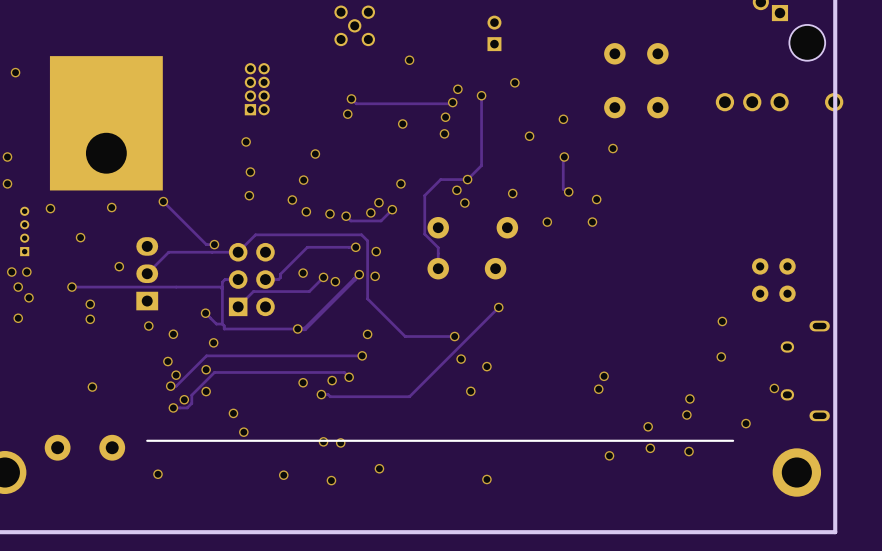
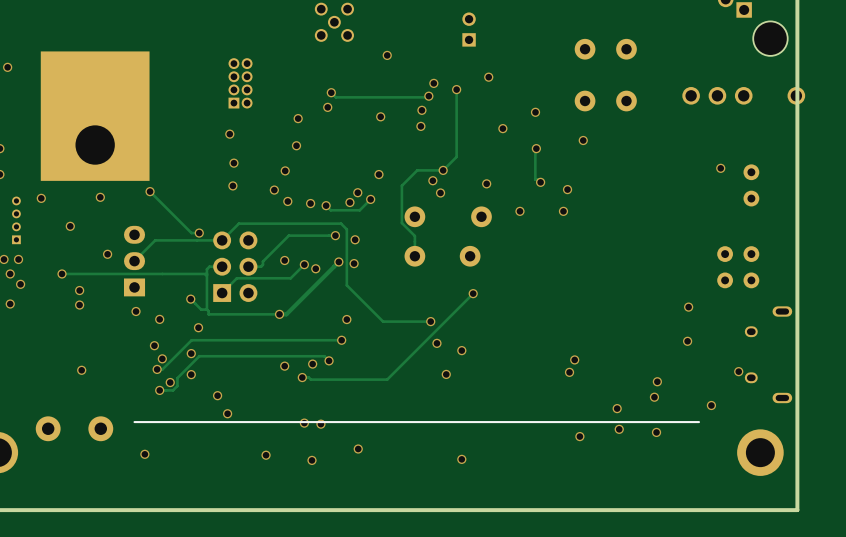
via: none -> (298, 118)
via: none -> (720, 168)
part: none -> (751, 185)

